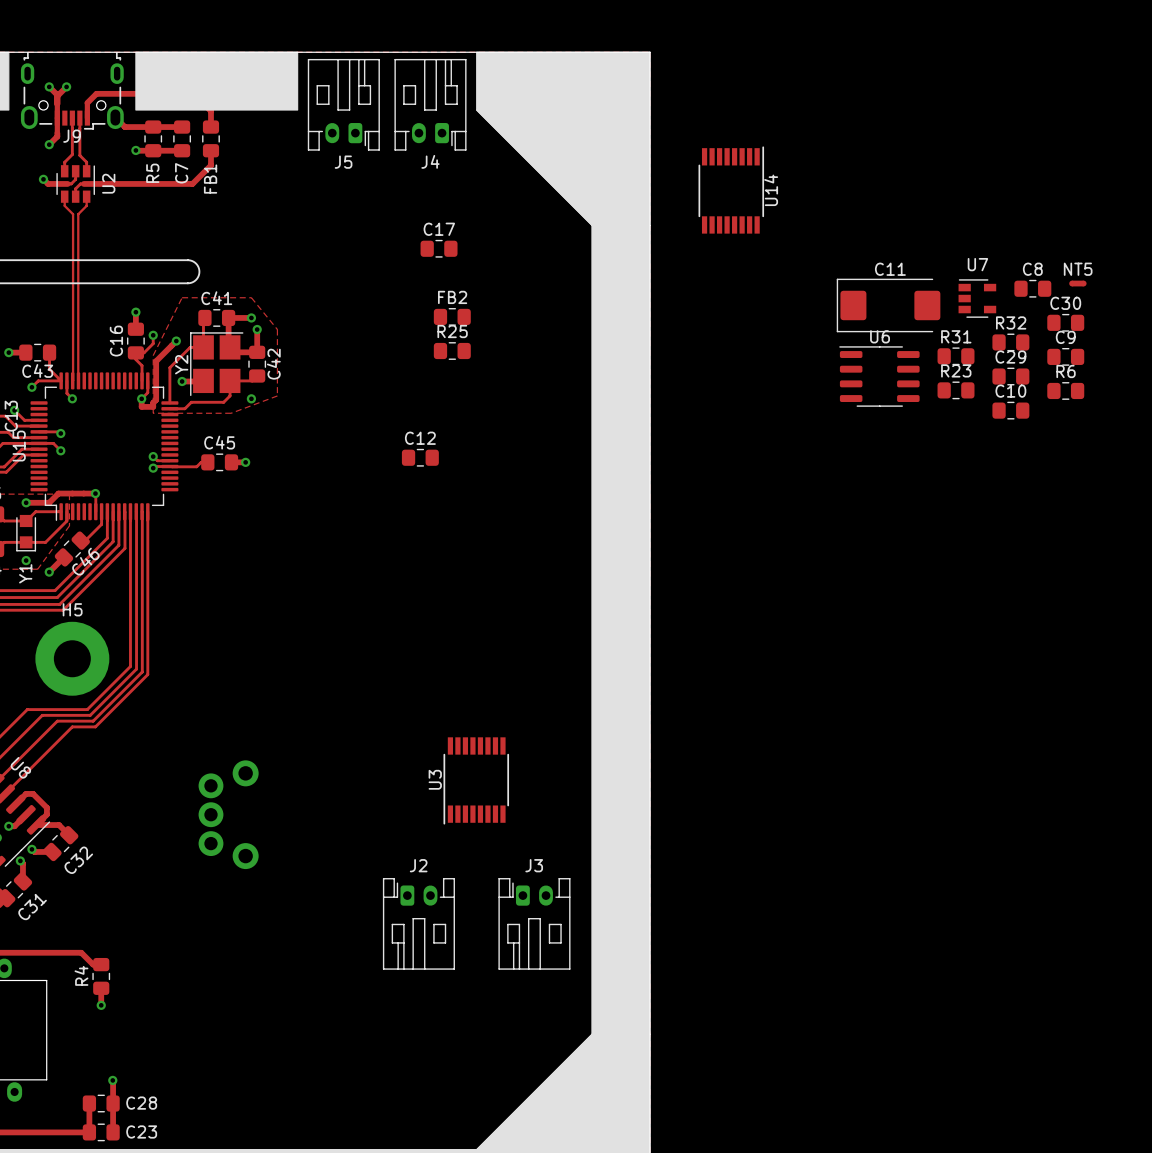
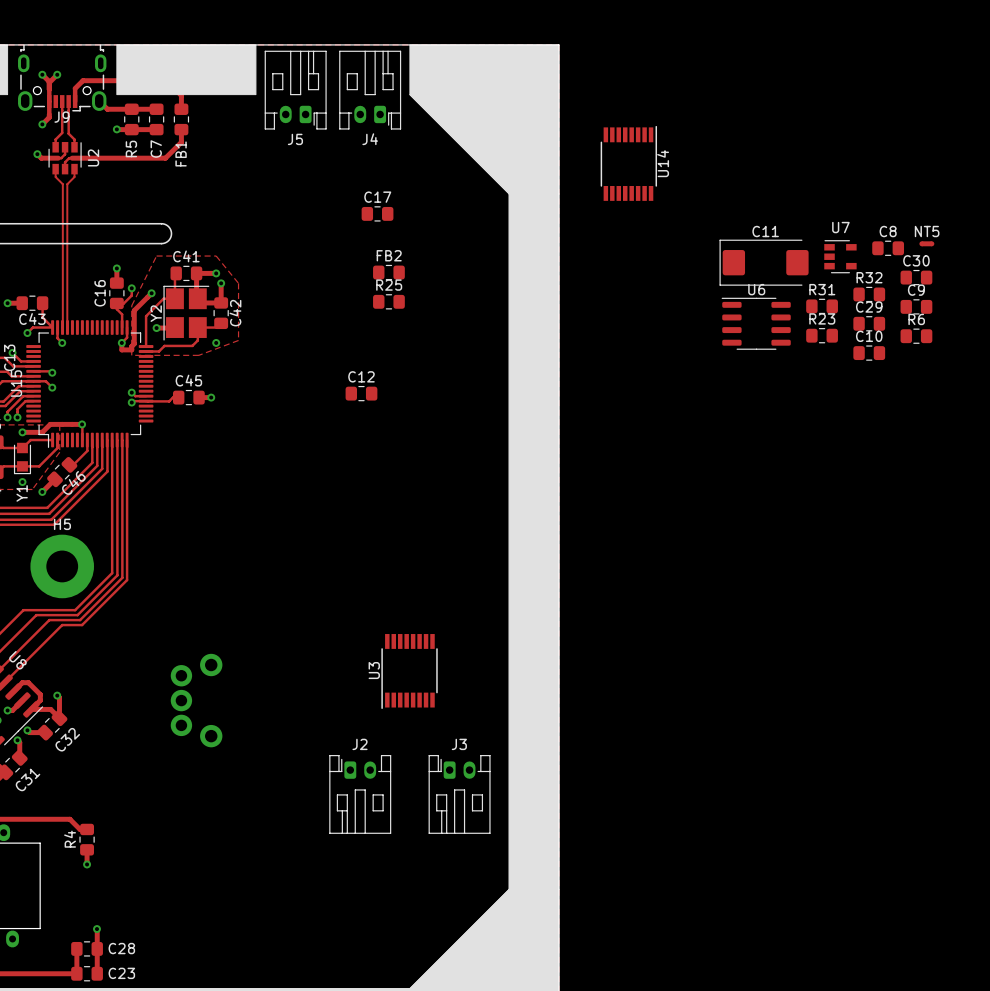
track: none -> (33, 396) (23, 396) (7, 411) (7, 417)
track: none -> (33, 401) (25, 401) (17, 409) (17, 417)
via: none -> (7, 417)
via: none -> (17, 417)
track: none -> (57, 695) (59, 697) (59, 718)
via: none -> (57, 695)

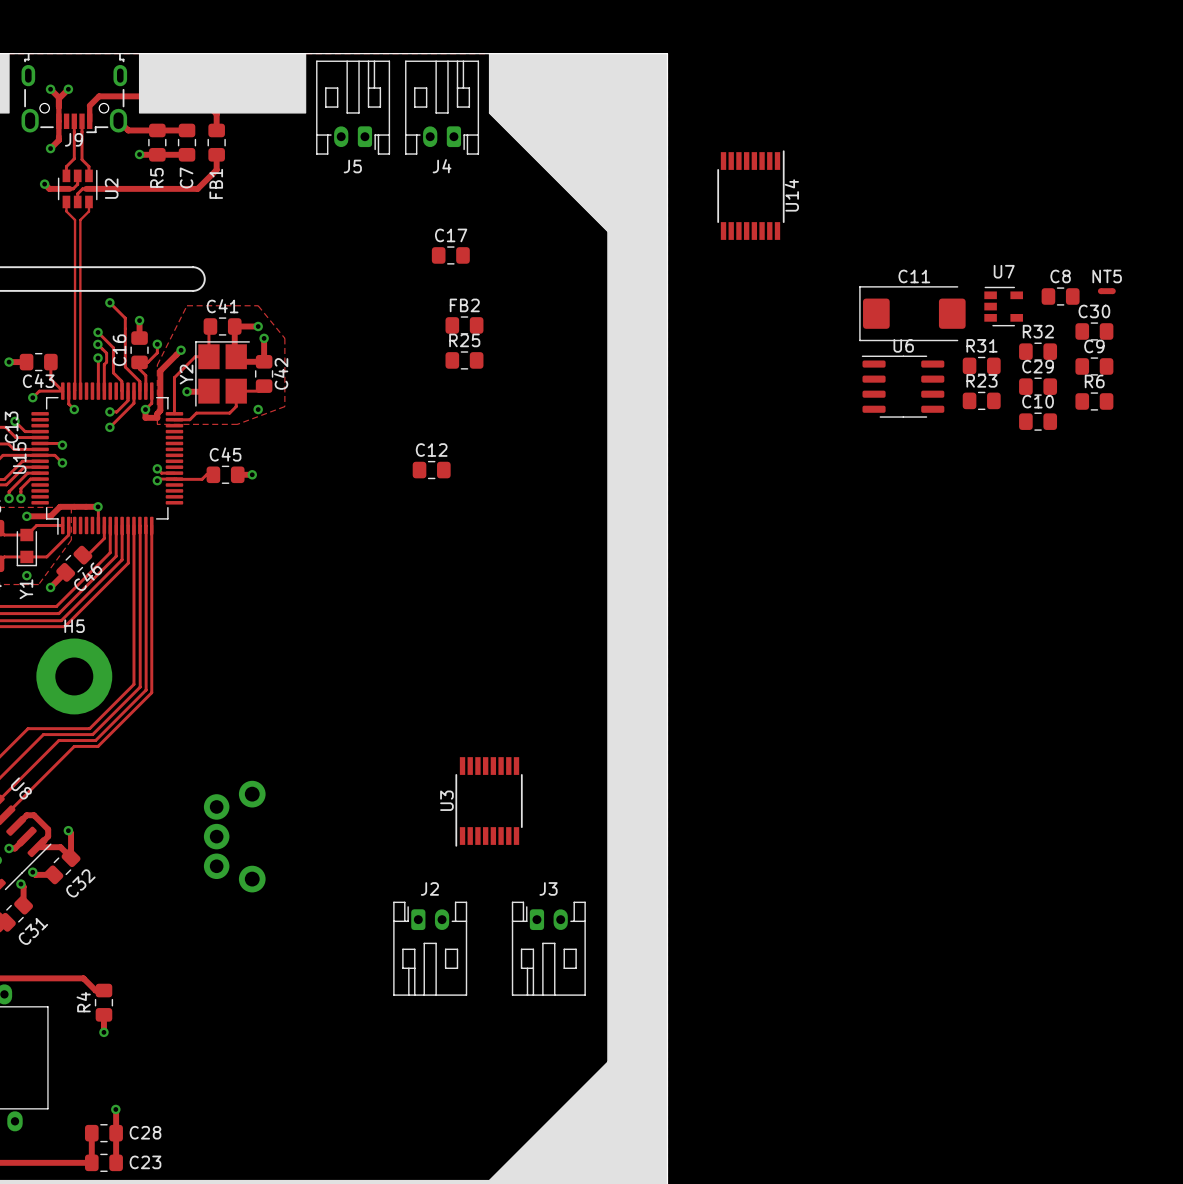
track: none -> (109, 302) (125, 318) (125, 367) (139, 381) (139, 391)
via: none -> (109, 302)
track: none -> (98, 332) (113, 347) (113, 372) (121, 381) (122, 391)
via: none -> (98, 332)
track: none -> (97, 344) (106, 353) (106, 362) (104, 364) (104, 391)
via: none -> (97, 344)
track: none -> (98, 358) (98, 391)
via: none -> (98, 358)
track: none -> (128, 391) (128, 400) (116, 411) (109, 411)
track: none -> (133, 391) (133, 403) (109, 427)
via: none -> (109, 411)
via: none -> (109, 427)

